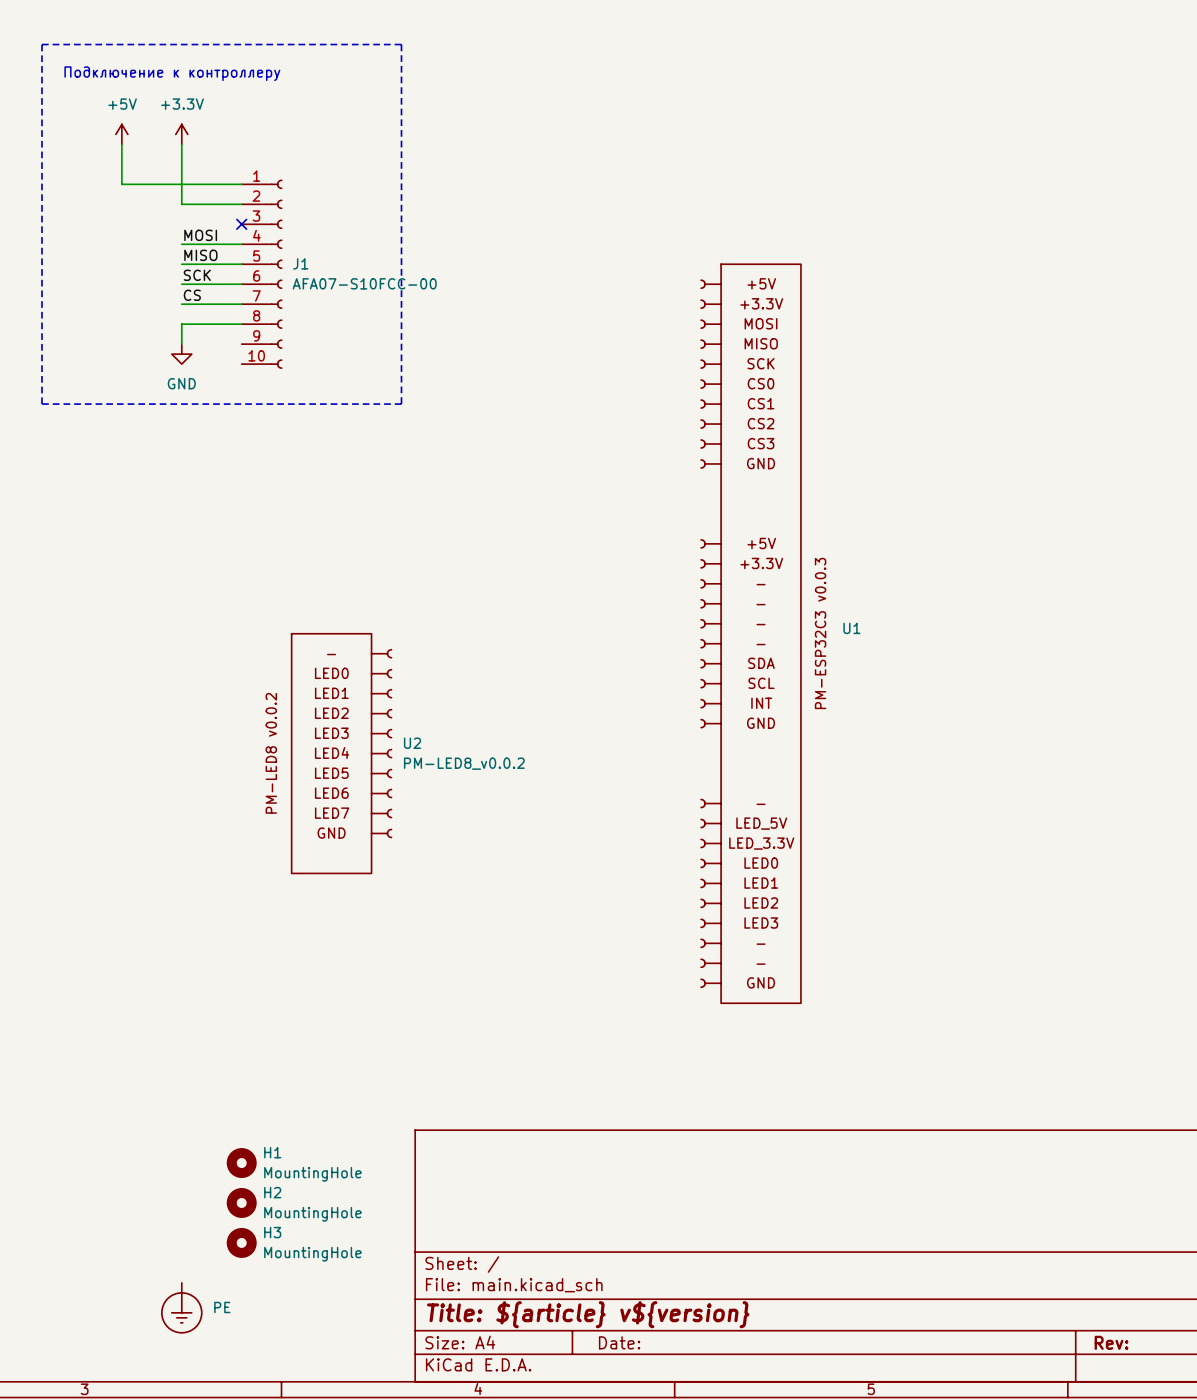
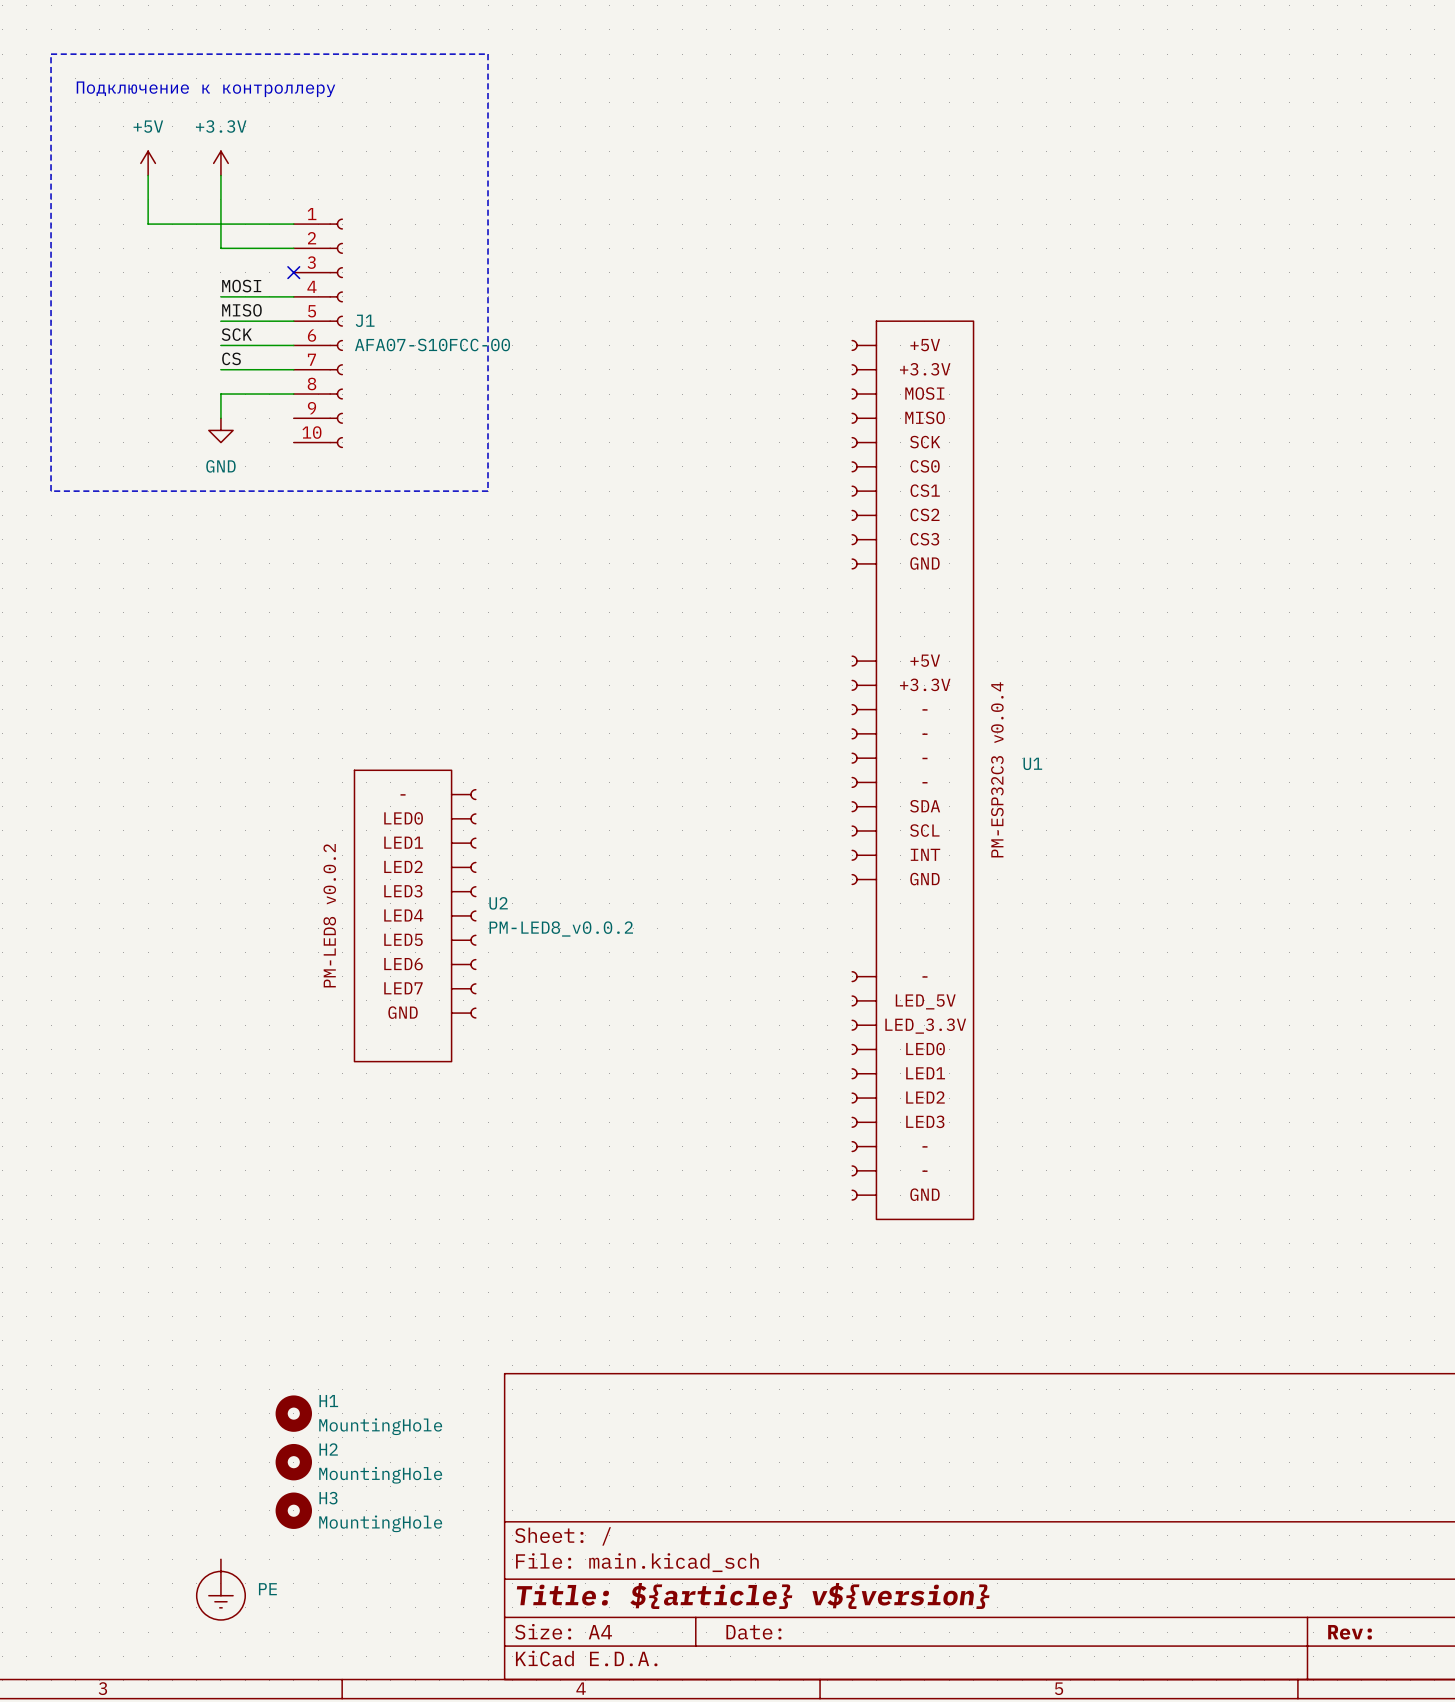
U1 text: PM-ESP32C3 v0.0.3 (820, 633) -> PM-ESP32C3 v0.0.4 (997, 769)

